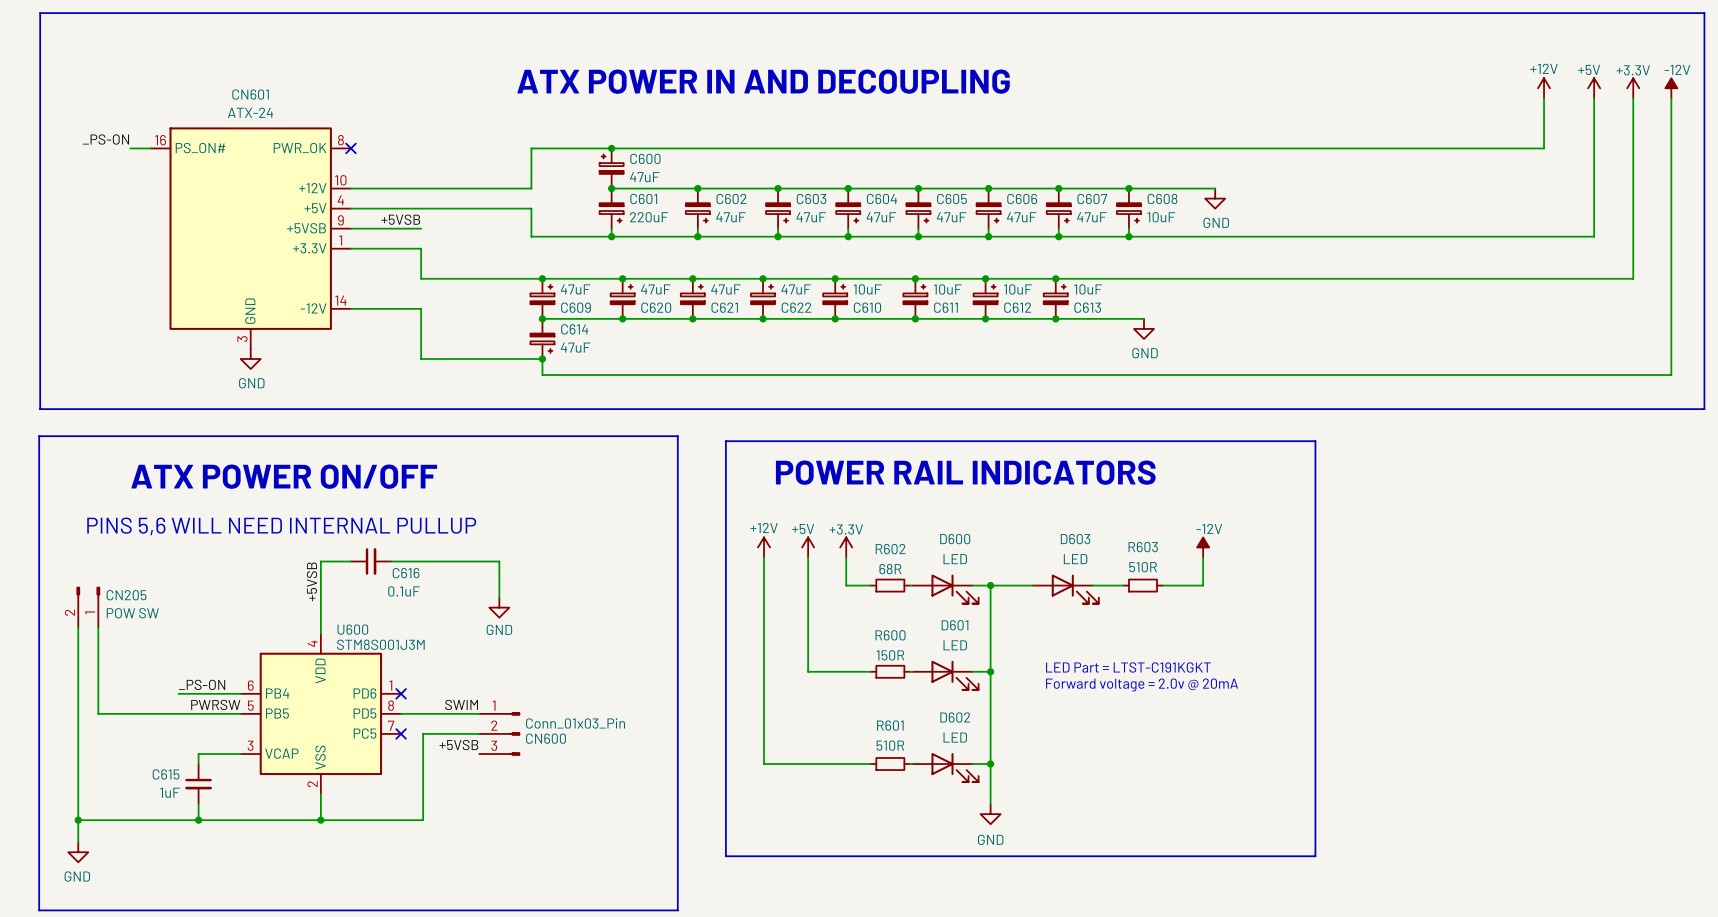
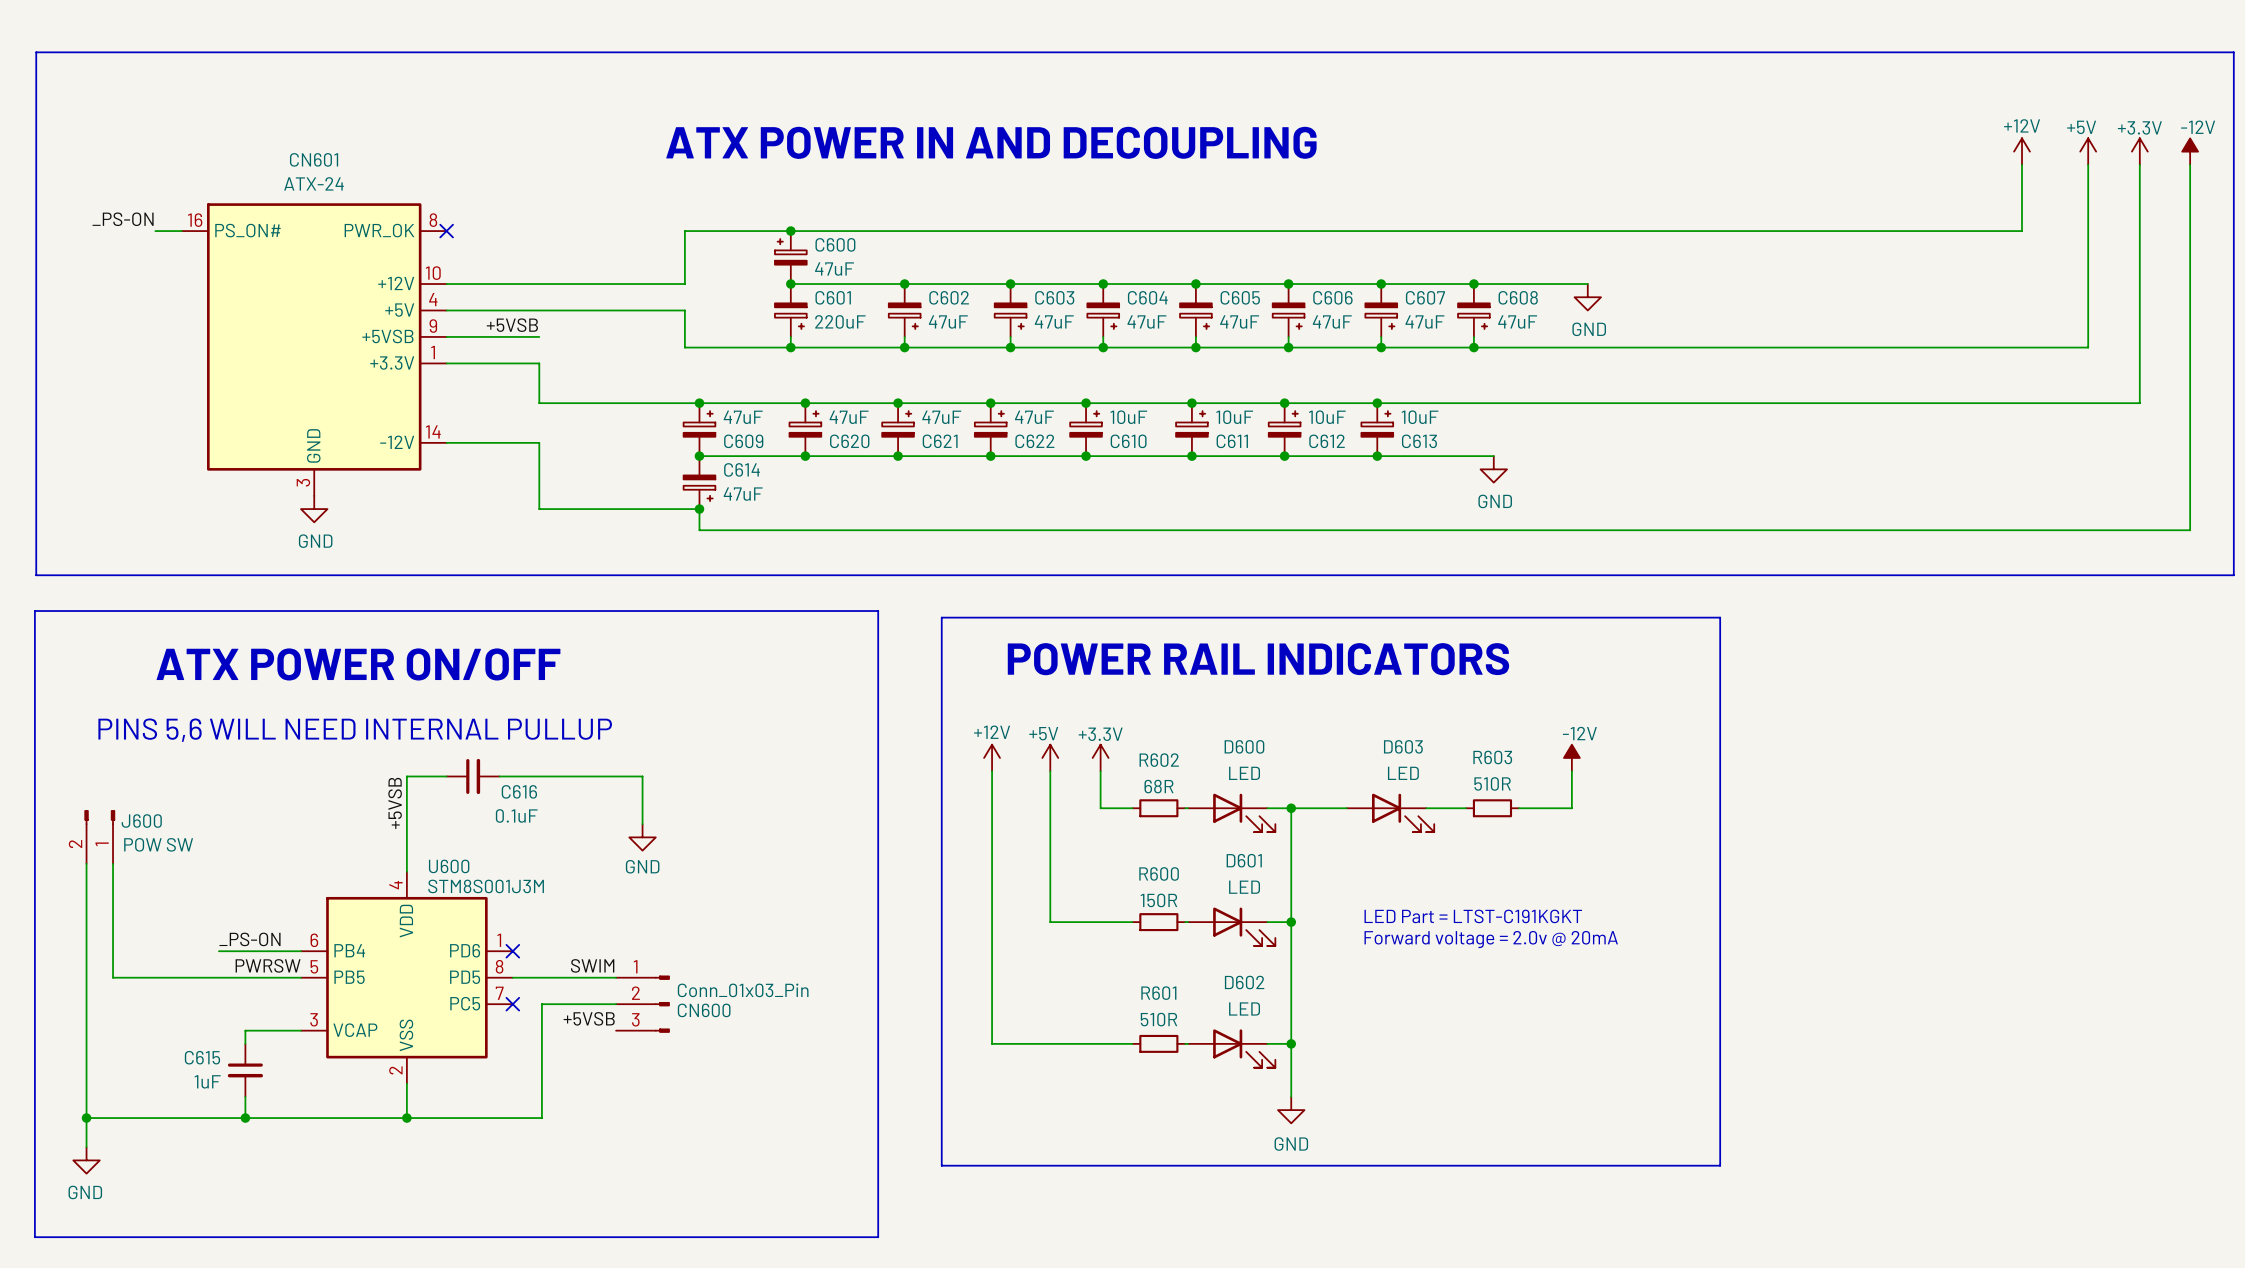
C608 value: 10uF (1161, 217) -> 47uF (1517, 321)
CN205 name: CN205 (126, 595) -> J600 (141, 821)

